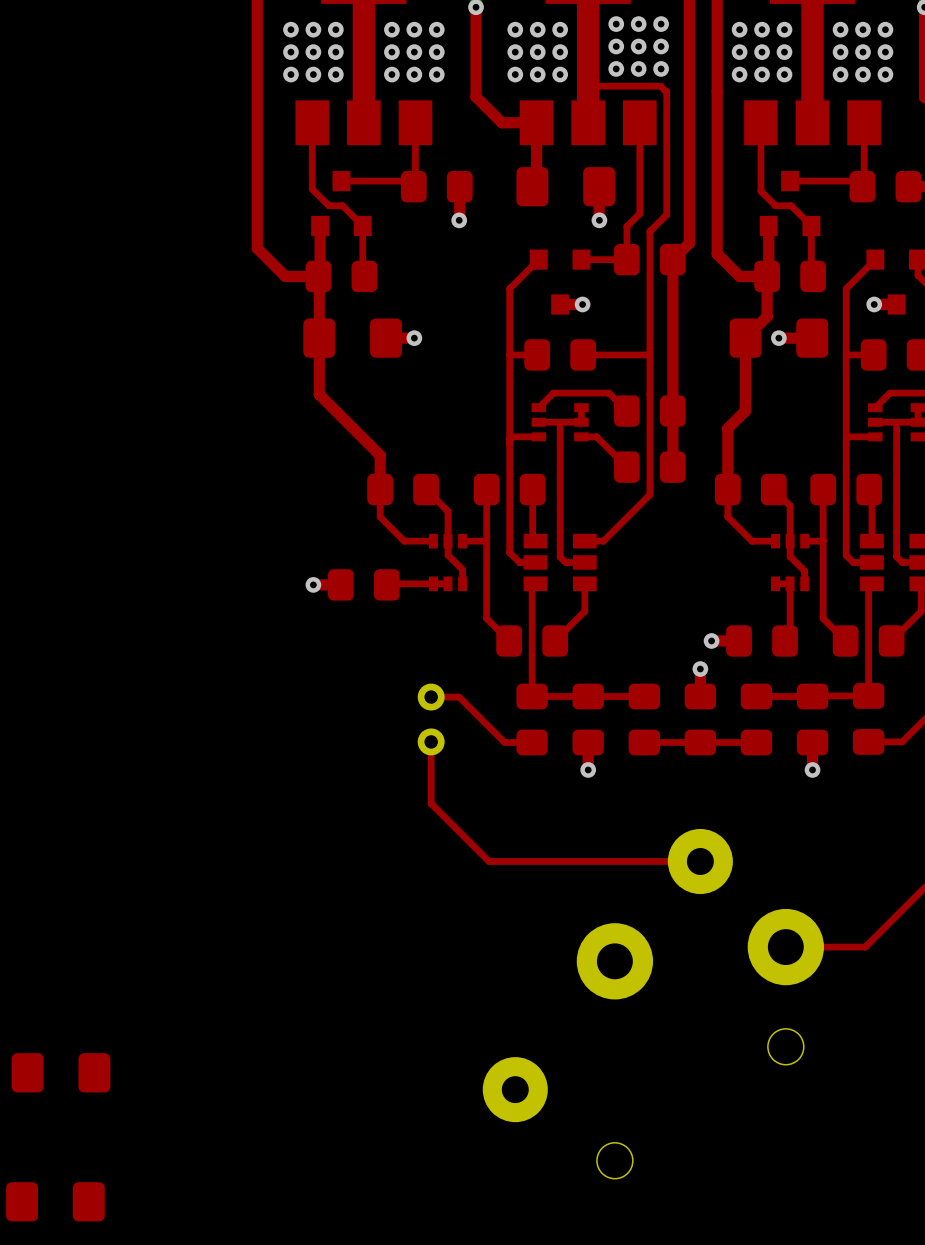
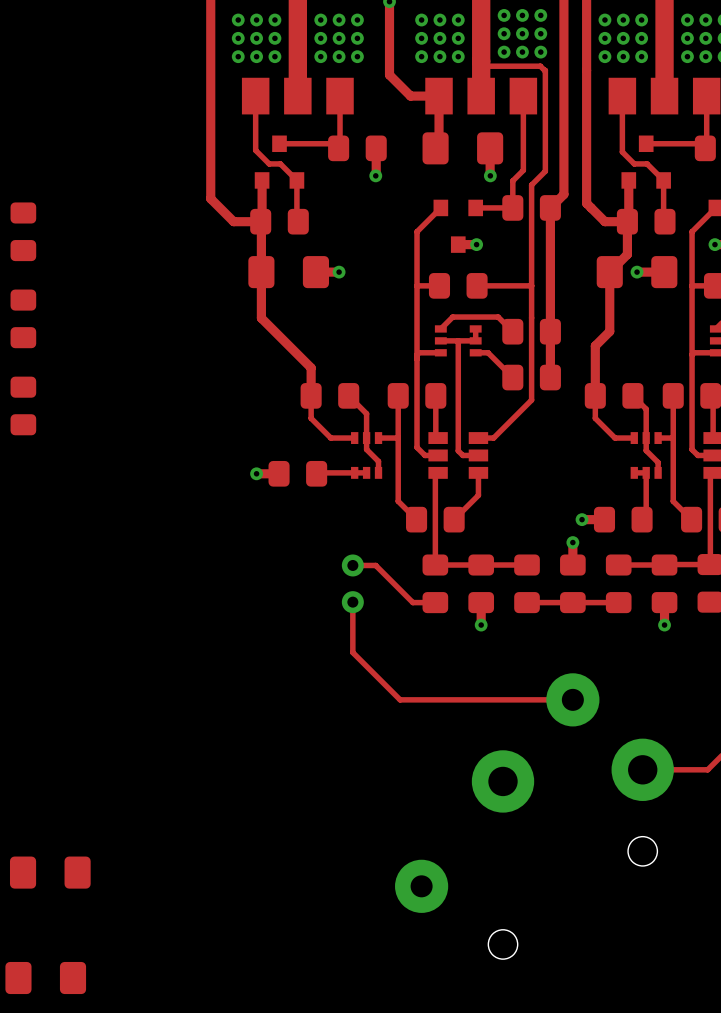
part: none -> (23, 231)
part: none -> (23, 318)
part: none -> (23, 405)

